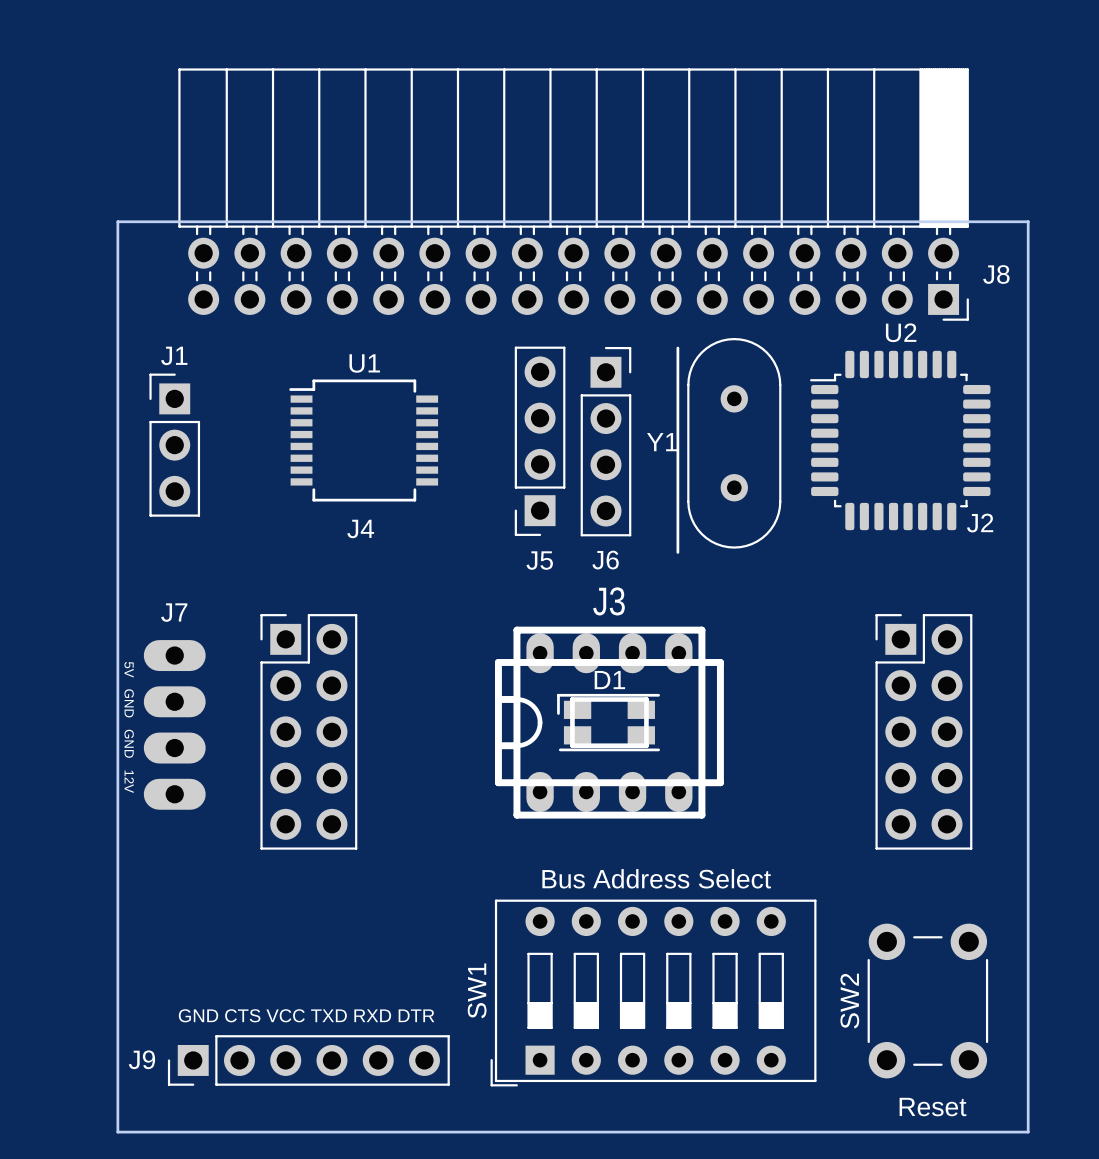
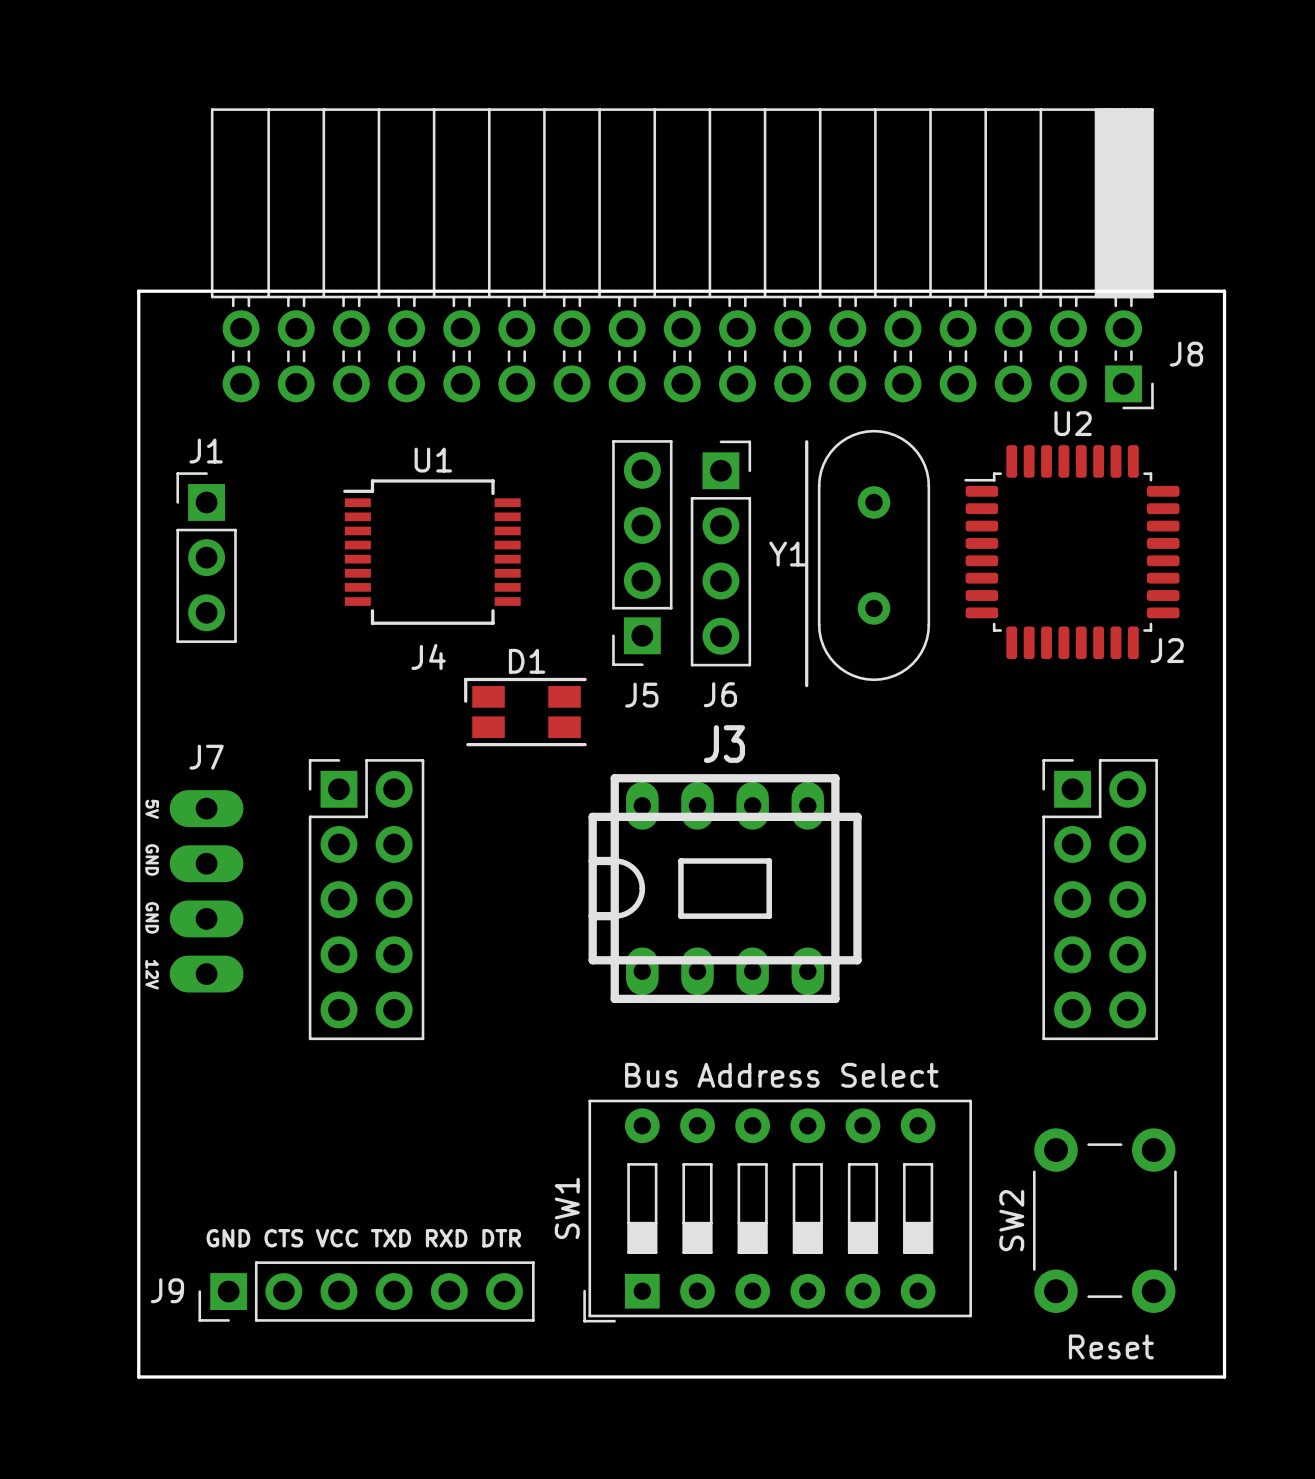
D1 position: (608, 722) -> (525, 712)

